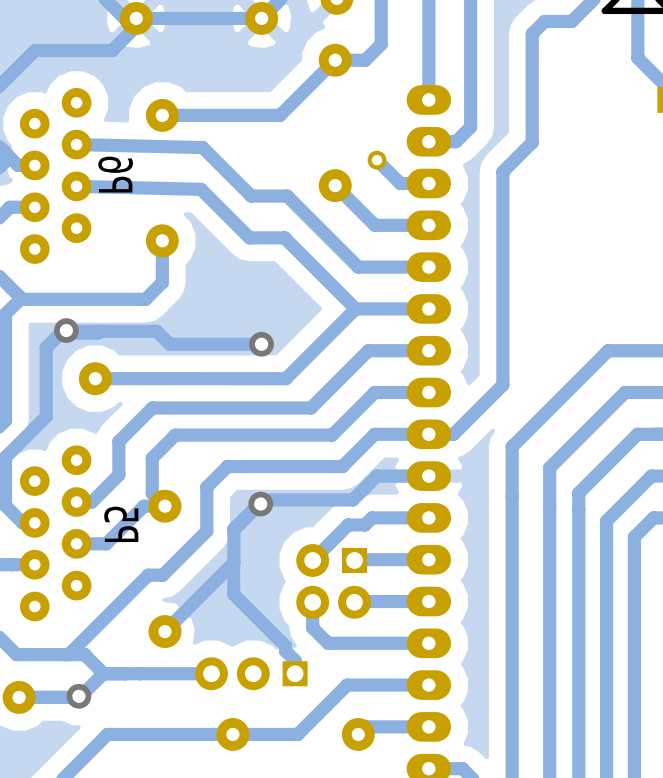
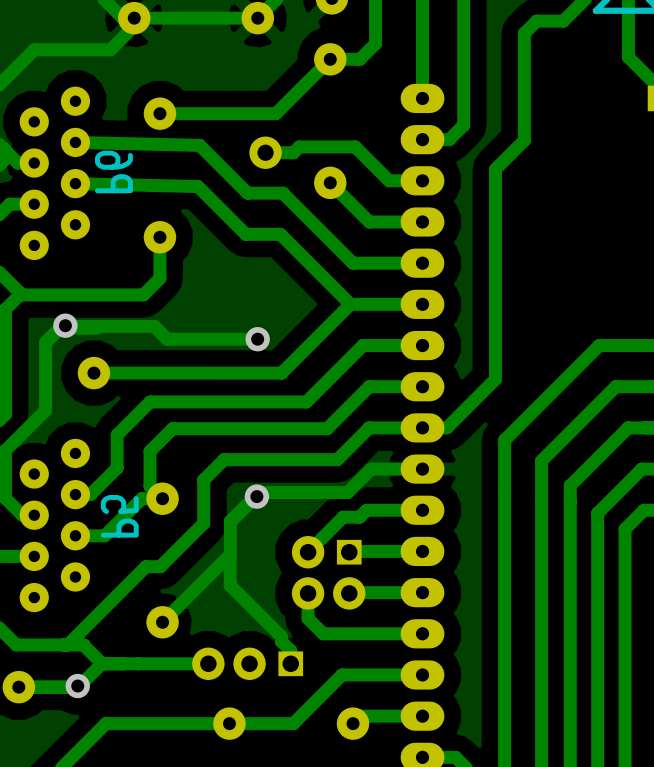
part: none -> (265, 152)
track: (377, 160) (400, 183) -> (265, 152) (293, 152) (299, 146) (355, 146) (389, 180) (394, 180)
part: (377, 160) -> none

